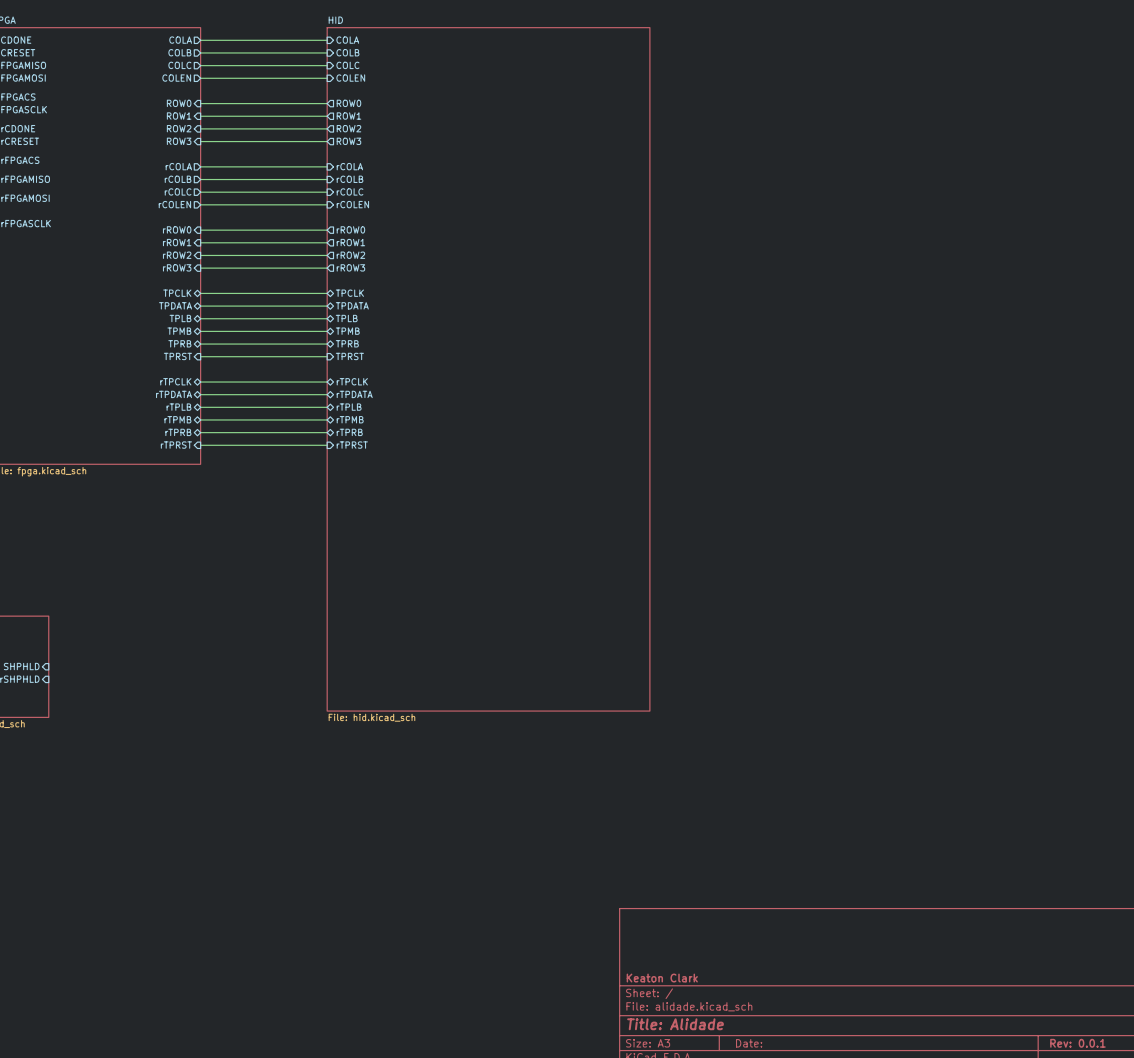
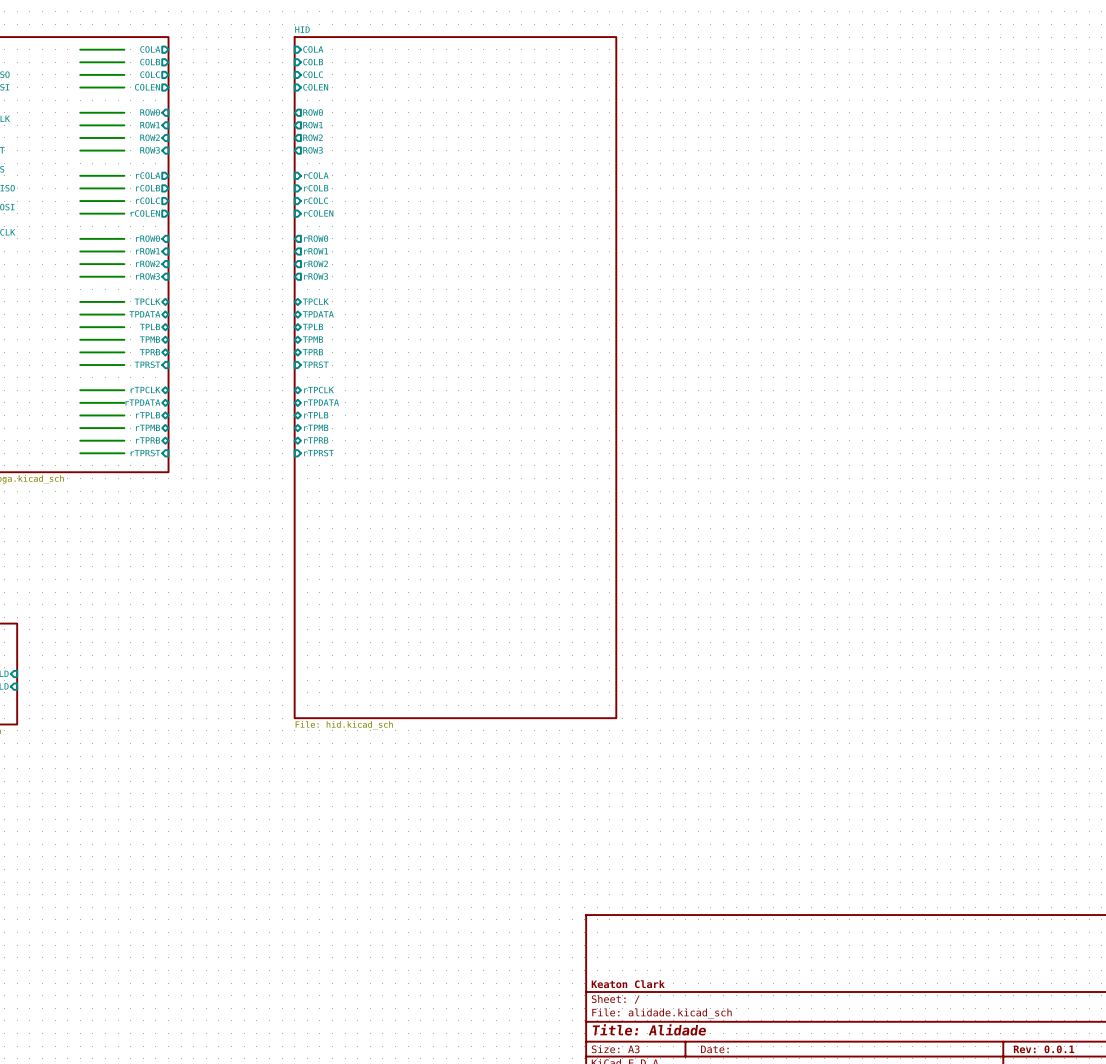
wire: none -> (80, 49) (124, 49)
wire: (200, 40) (327, 40) -> none
wire: none -> (80, 62) (124, 62)
wire: (200, 52) (327, 52) -> none
wire: none -> (80, 74) (124, 74)
wire: (200, 65) (327, 65) -> none
wire: none -> (80, 87) (124, 87)
wire: (200, 78) (327, 78) -> none
wire: none -> (80, 112) (124, 112)
wire: (200, 103) (327, 103) -> none
wire: none -> (80, 125) (124, 125)
wire: (200, 116) (327, 116) -> none
wire: none -> (80, 137) (124, 137)
wire: (200, 128) (327, 128) -> none
wire: none -> (80, 150) (124, 150)
wire: (200, 141) (327, 141) -> none
wire: none -> (80, 175) (124, 175)
wire: (200, 166) (327, 166) -> none
wire: none -> (80, 188) (124, 188)
wire: (200, 179) (327, 179) -> none
wire: none -> (80, 201) (124, 201)
wire: (200, 192) (327, 192) -> none
wire: none -> (80, 213) (124, 213)
wire: (200, 204) (327, 204) -> none
wire: none -> (80, 238) (124, 238)
wire: (200, 230) (327, 230) -> none
wire: none -> (80, 251) (124, 251)
wire: (200, 242) (327, 242) -> none
wire: none -> (80, 264) (124, 264)
wire: (200, 255) (327, 255) -> none
wire: none -> (80, 276) (124, 276)
wire: (200, 268) (327, 268) -> none
wire: none -> (80, 301) (124, 301)
wire: (200, 293) (327, 293) -> none
wire: none -> (80, 314) (124, 314)
wire: (200, 306) (327, 306) -> none
wire: none -> (80, 327) (124, 327)
wire: (200, 318) (327, 318) -> none
wire: none -> (80, 339) (124, 339)
wire: (200, 331) (327, 331) -> none
wire: none -> (80, 352) (124, 352)
wire: (200, 344) (327, 344) -> none
wire: none -> (80, 365) (124, 365)
wire: (200, 356) (327, 356) -> none
wire: none -> (80, 390) (124, 390)
wire: (200, 382) (327, 382) -> none
wire: none -> (80, 402) (124, 402)
wire: (200, 394) (327, 394) -> none
wire: none -> (80, 415) (124, 415)
wire: (200, 407) (327, 407) -> none
wire: none -> (80, 428) (124, 428)
wire: (200, 419) (327, 419) -> none
wire: none -> (80, 440) (124, 440)
wire: (200, 432) (327, 432) -> none
wire: none -> (80, 453) (124, 453)
wire: (200, 445) (327, 445) -> none

